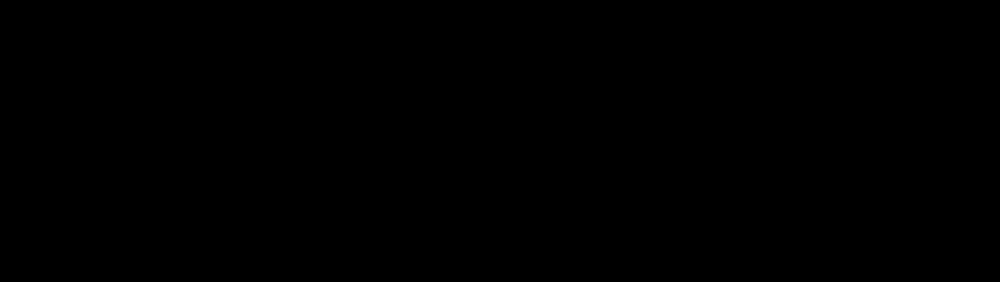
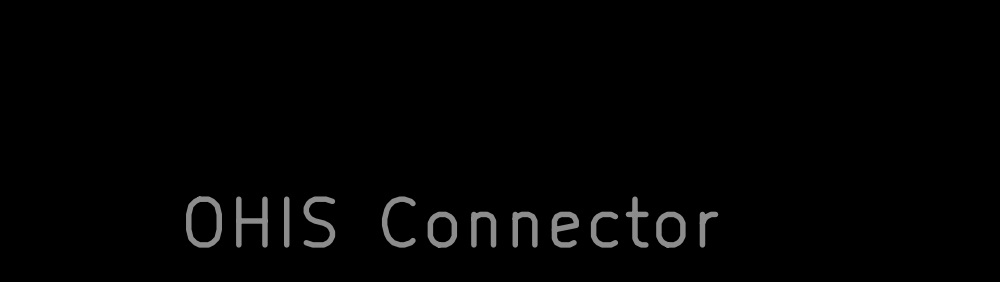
text: none -> OHIS Connector (452, 222)

